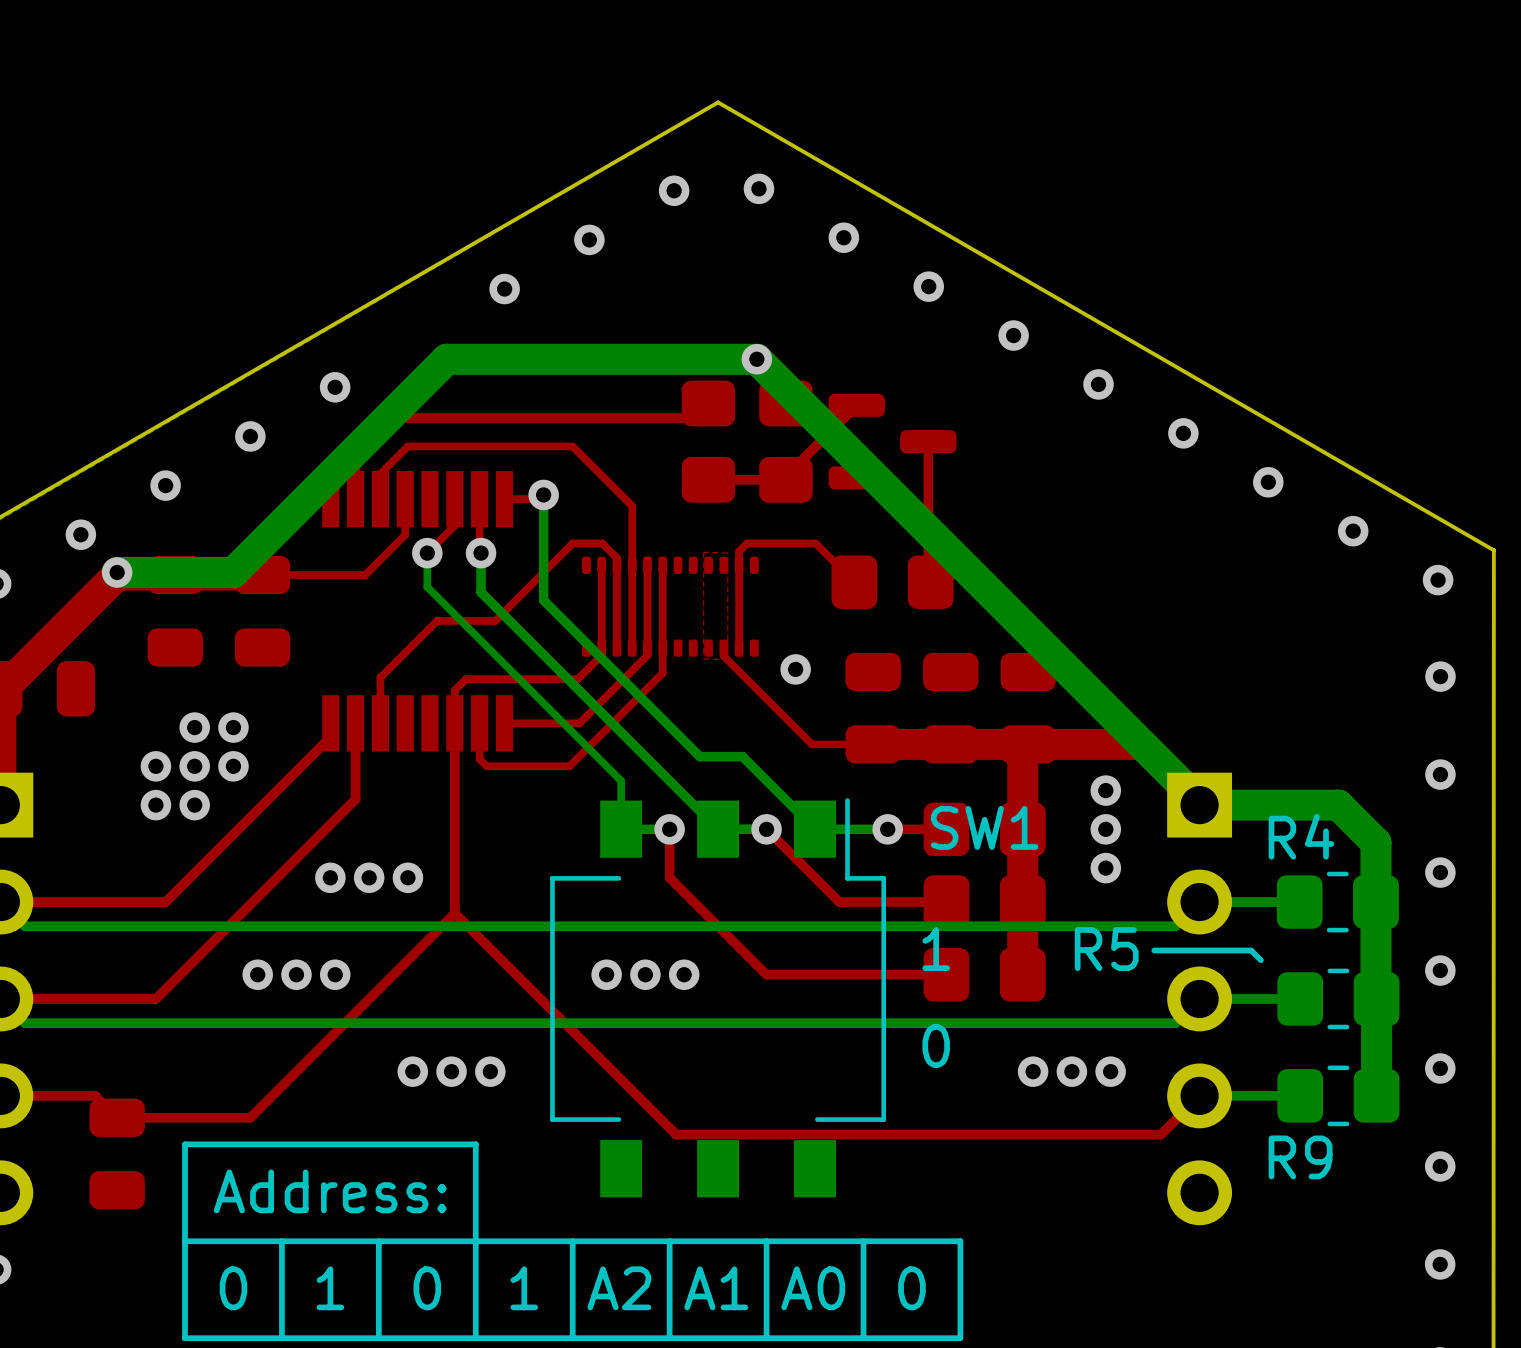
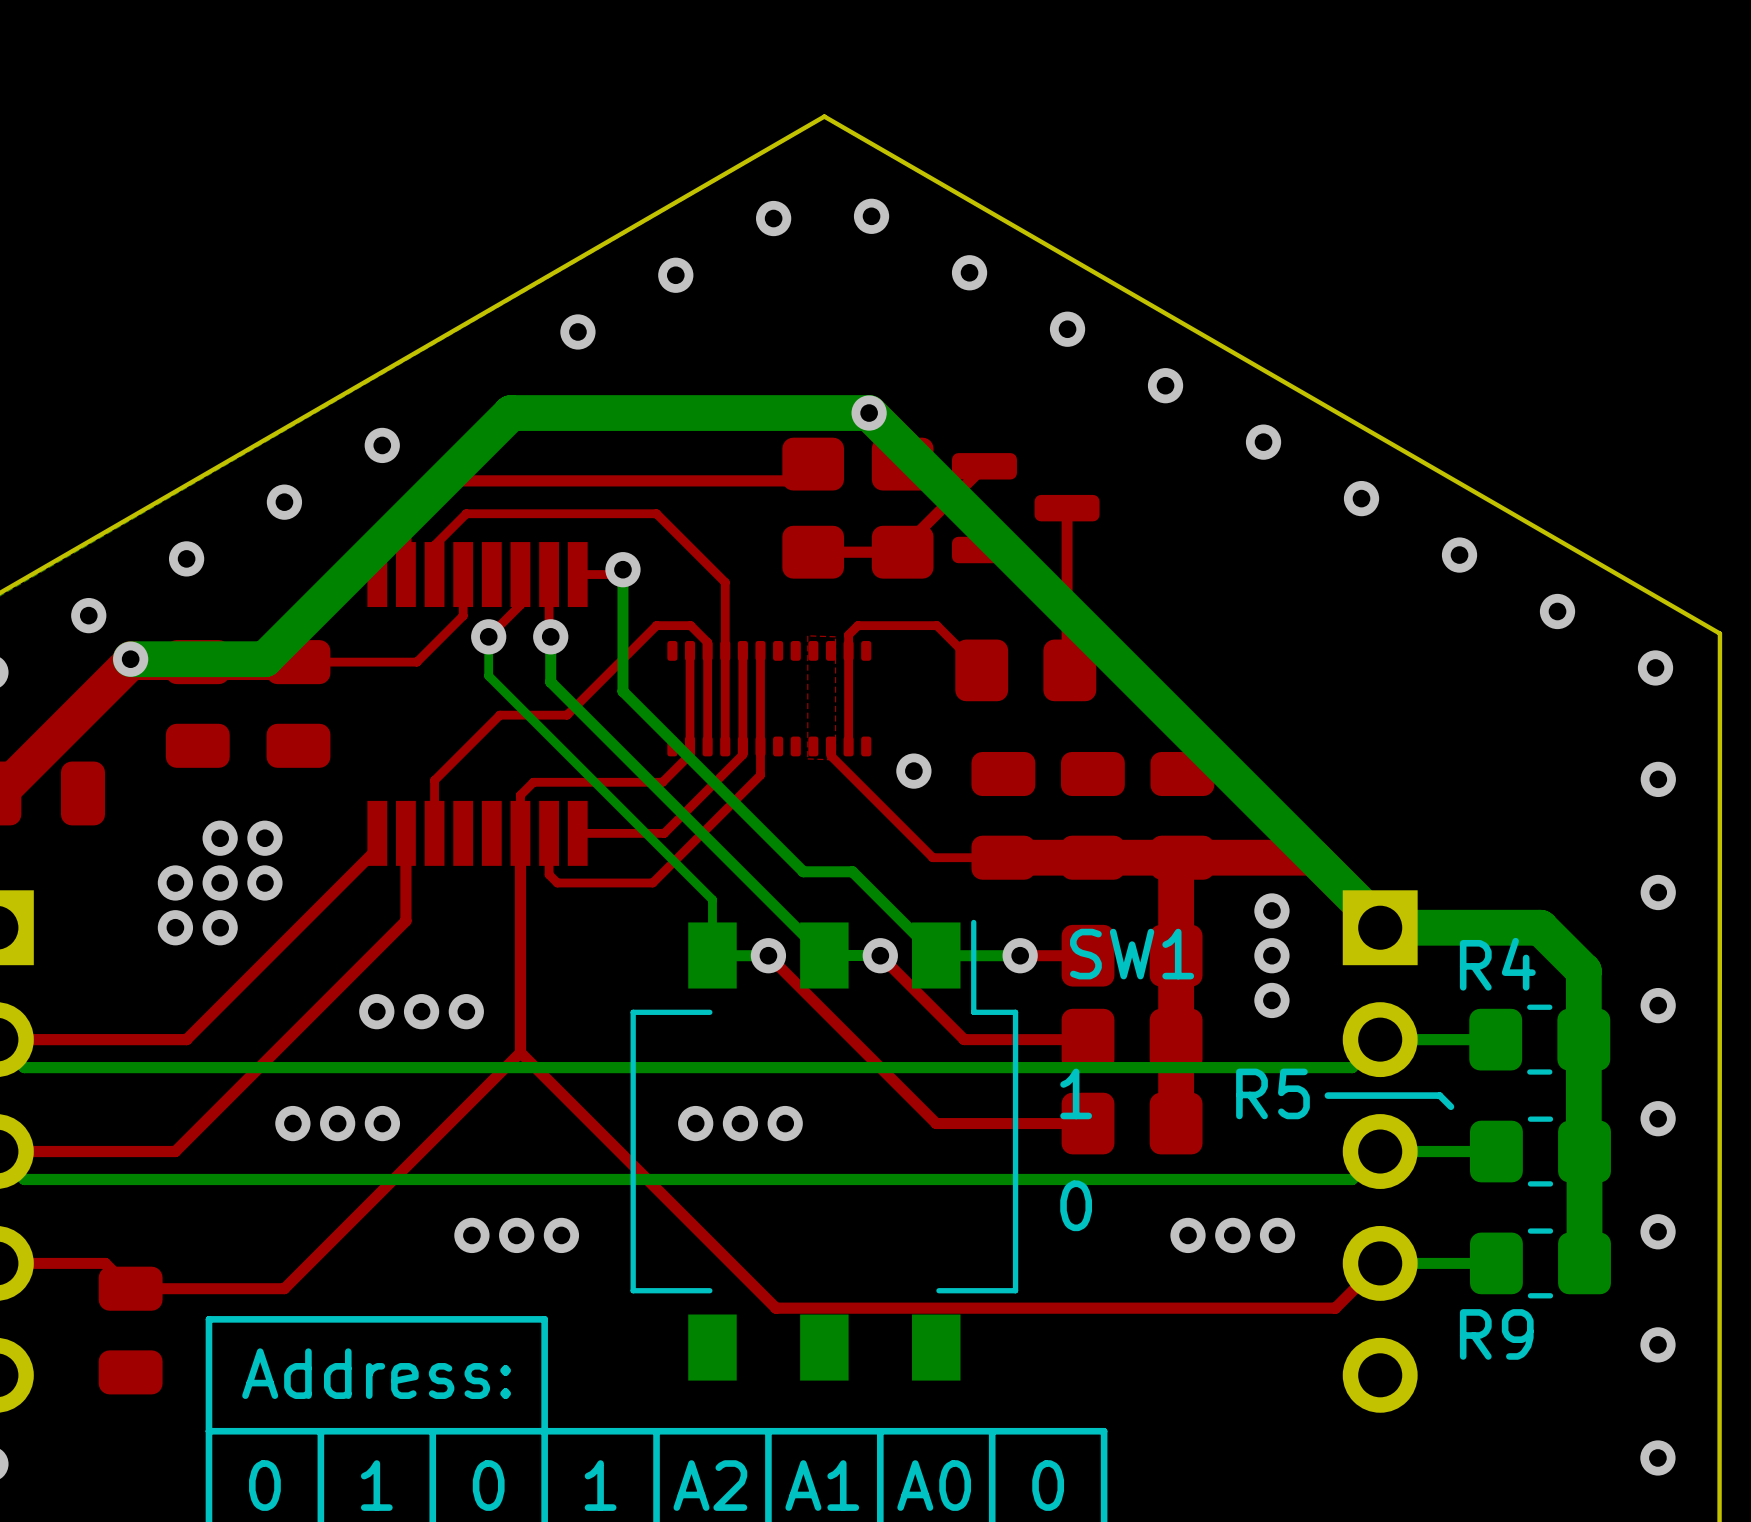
top track: (669, 829) (669, 877) (766, 974) (815, 974) -> (768, 955) (936, 1123)

